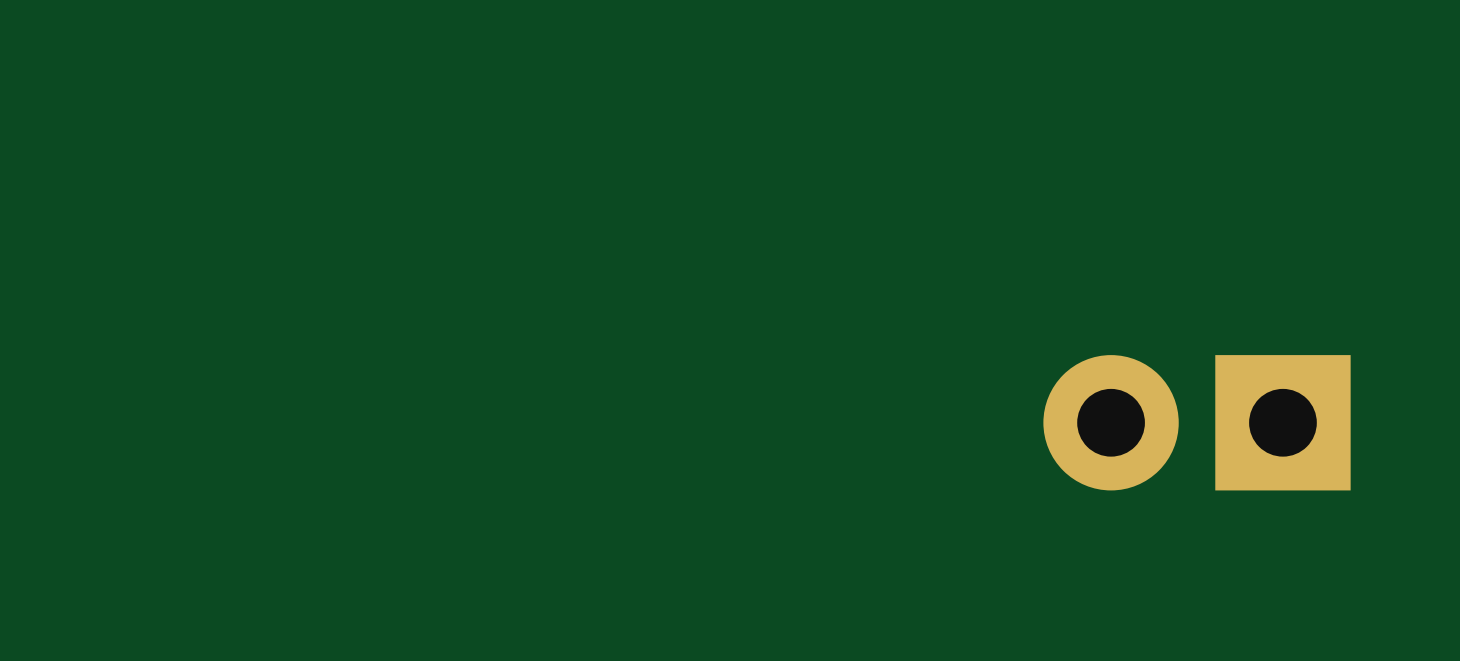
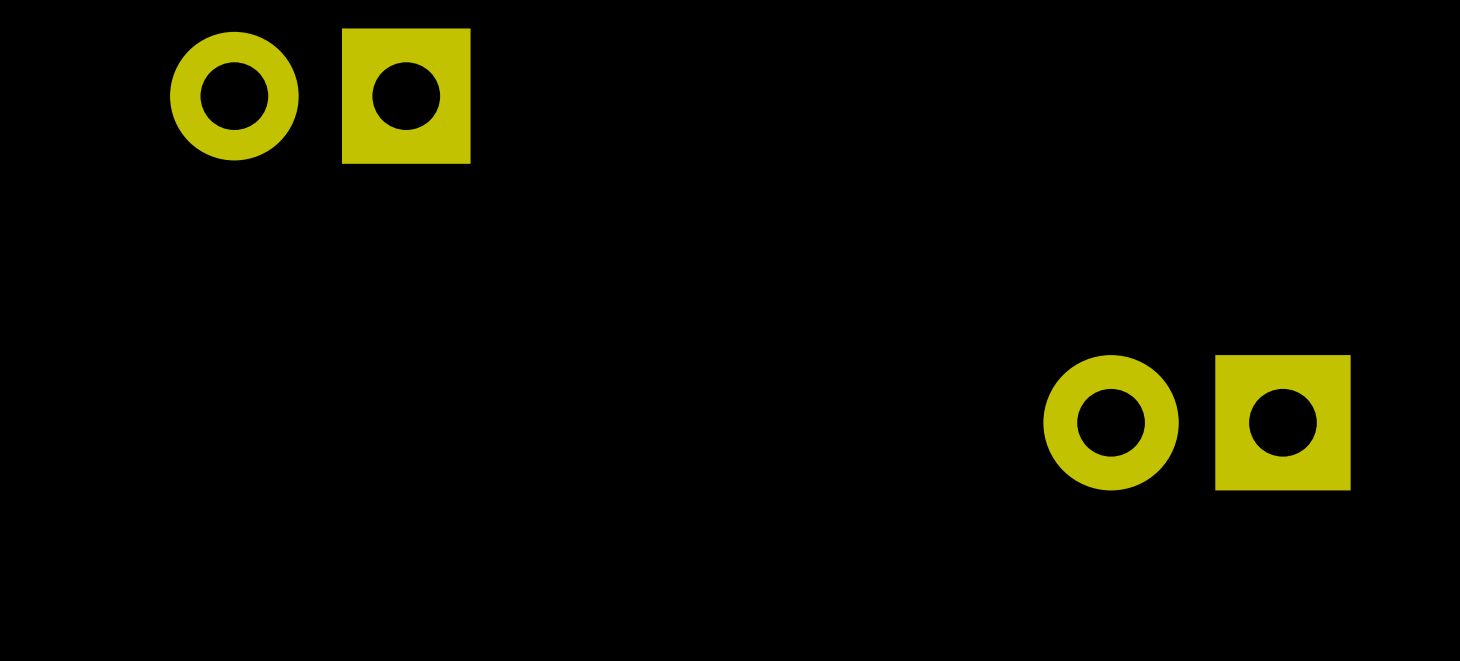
part: none -> (320, 96)

